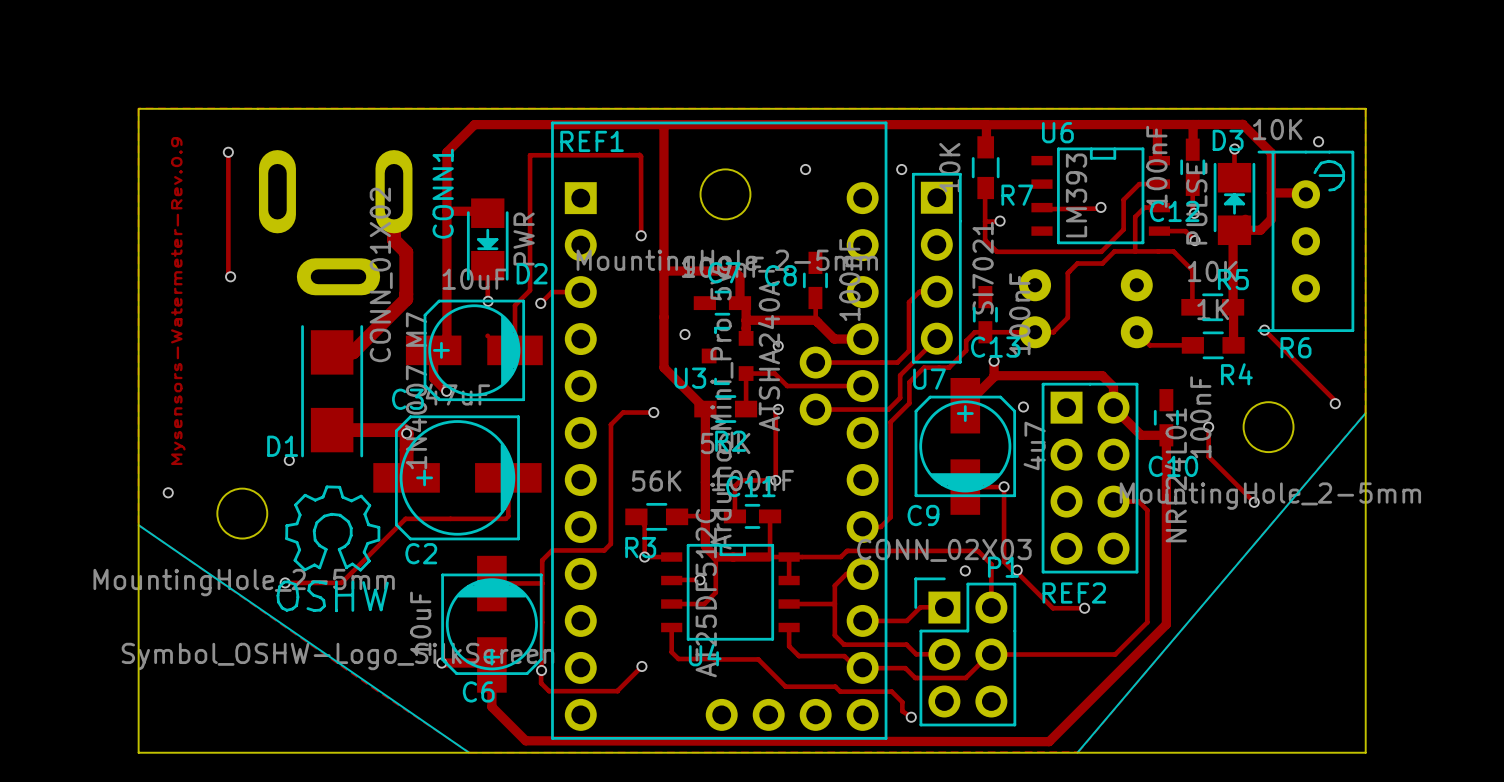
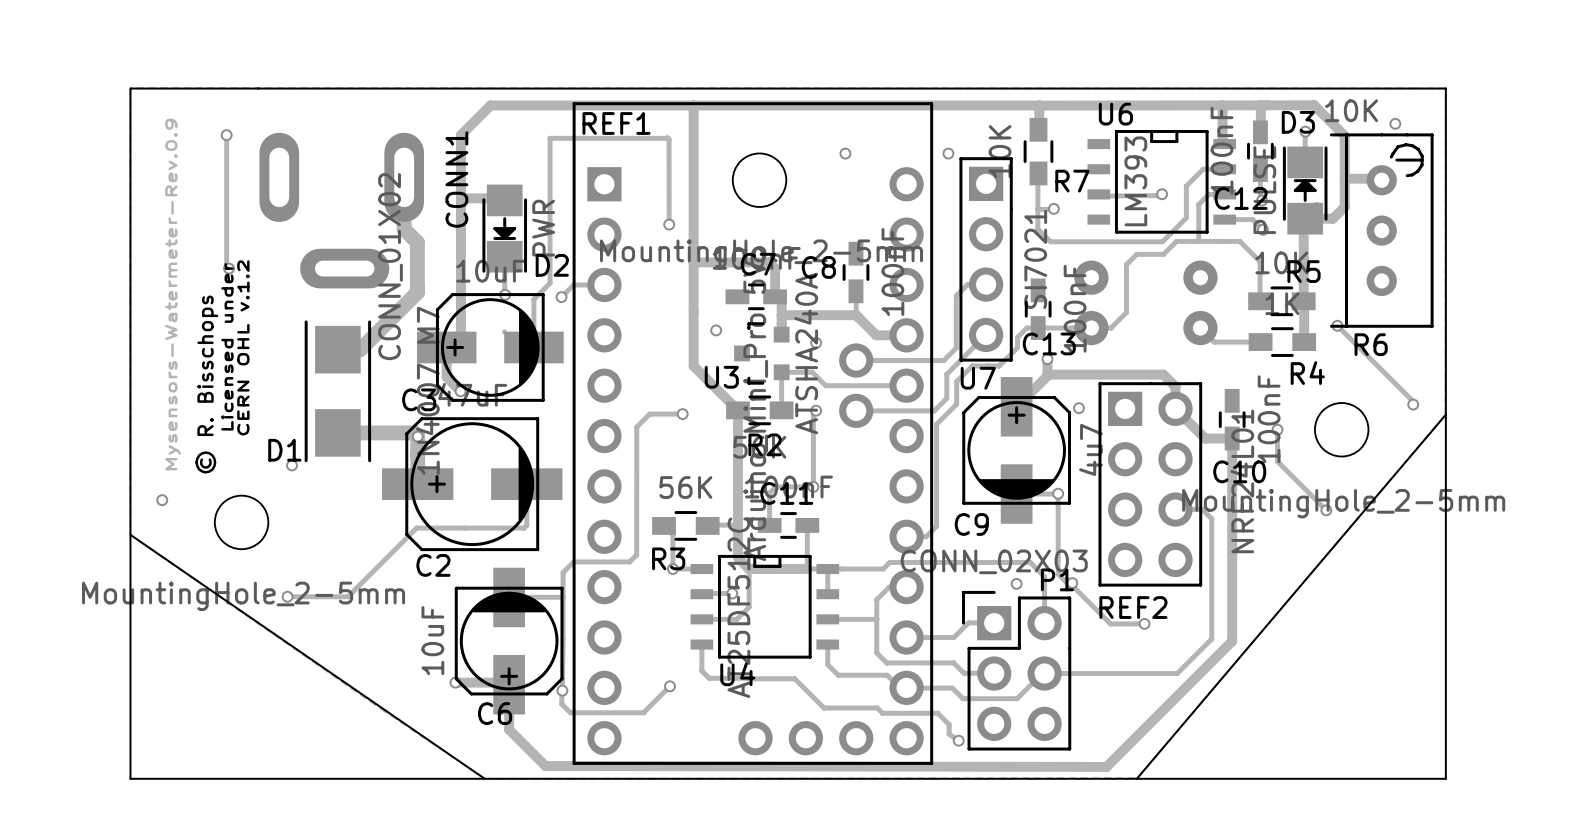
text: none -> Licensed under (227, 346)
text: none -> CERN OHL v.1.2 (243, 347)
text: none -> © R. Bisschops (206, 384)
drawing: [276, 485, 389, 613] -> none

